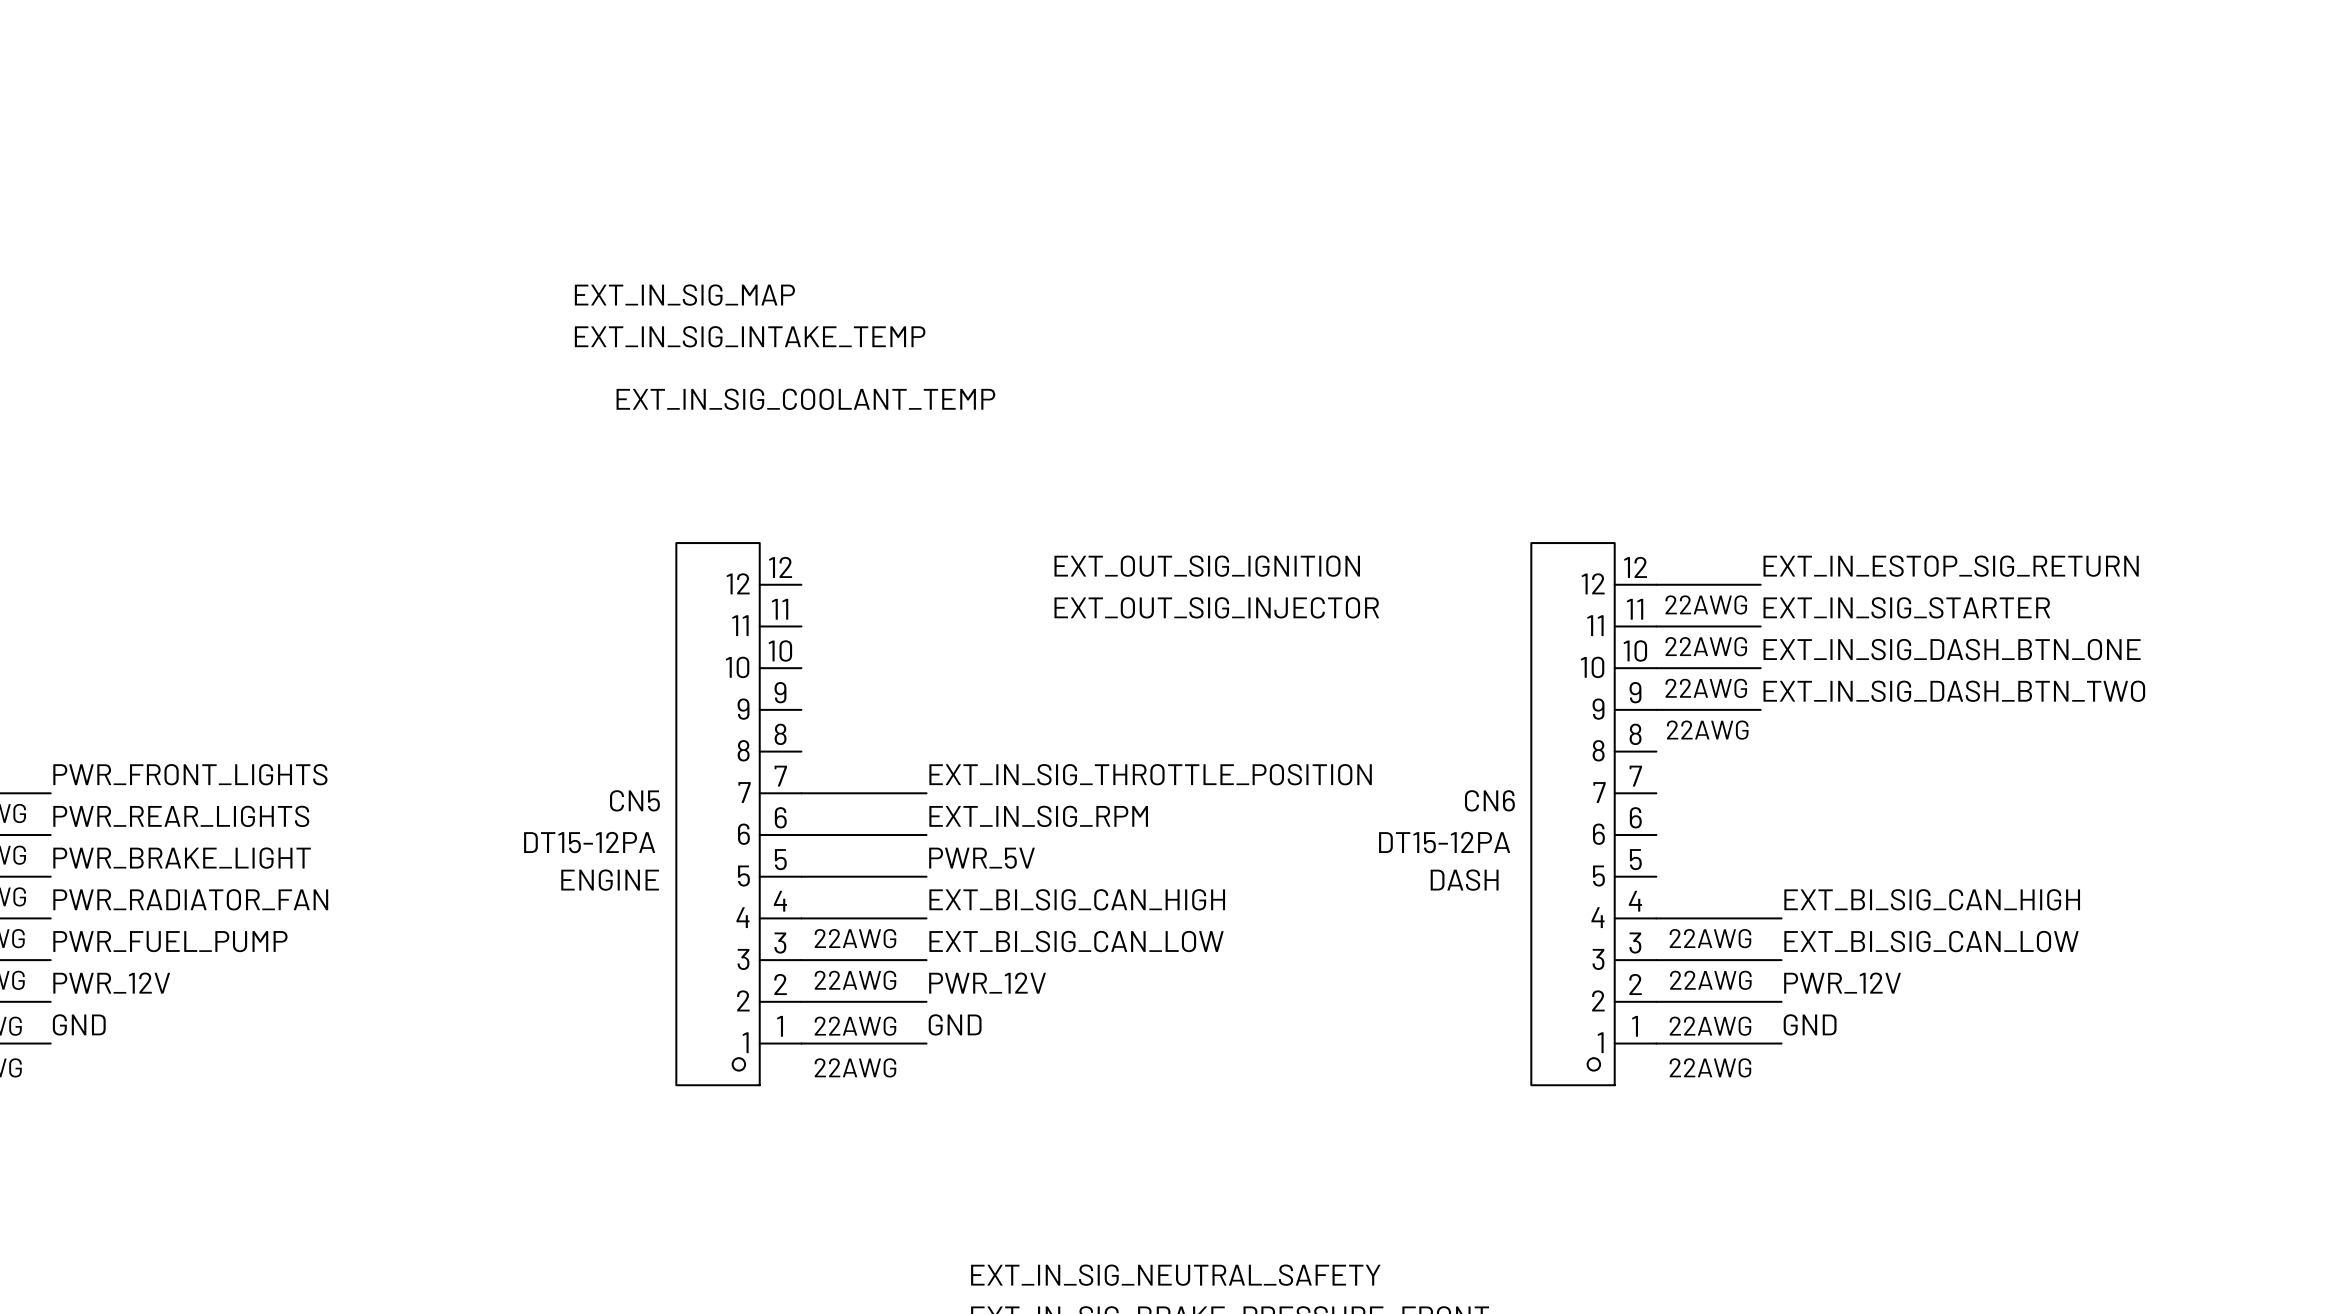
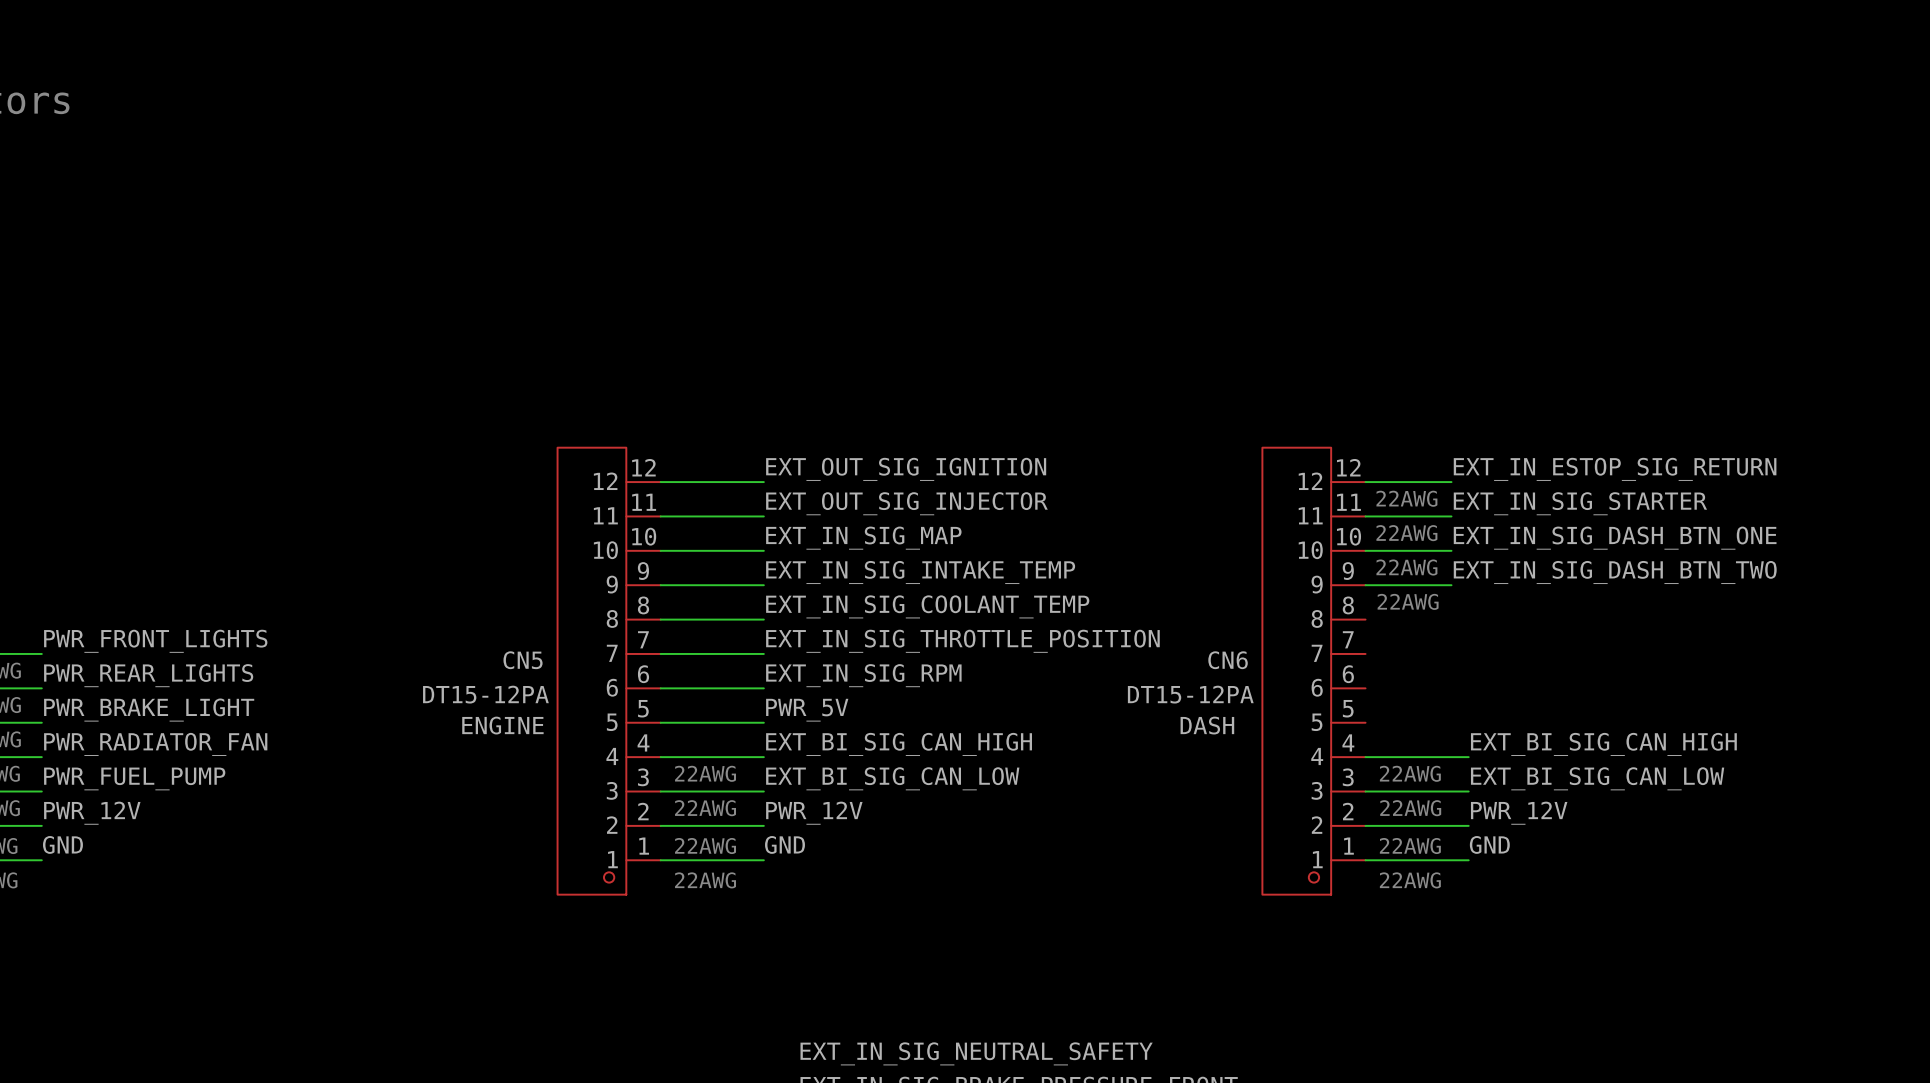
label: EXT_IN_SIG_MAP (684, 295) -> none
label: EXT_IN_SIG_INTAKE_TEMP (750, 336) -> none
label: EXT_IN_SIG_COOLANT_TEMP (805, 399) -> none
label position: EXT_OUT_SIG_IGNITION (1207, 566) -> EXT_OUT_SIG_IGNITION (906, 469)
wire: none -> (660, 482) (763, 482)
label position: EXT_OUT_SIG_INJECTOR (1216, 607) -> EXT_OUT_SIG_INJECTOR (906, 503)
wire: none -> (660, 516) (763, 516)
label: none -> EXT_IN_SIG_MAP (863, 538)
wire: none -> (660, 550) (763, 550)
label: none -> EXT_IN_SIG_INTAKE_TEMP (920, 572)
wire: none -> (660, 585) (763, 585)
label: none -> EXT_IN_SIG_COOLANT_TEMP (927, 606)
wire: none -> (660, 619) (763, 619)

